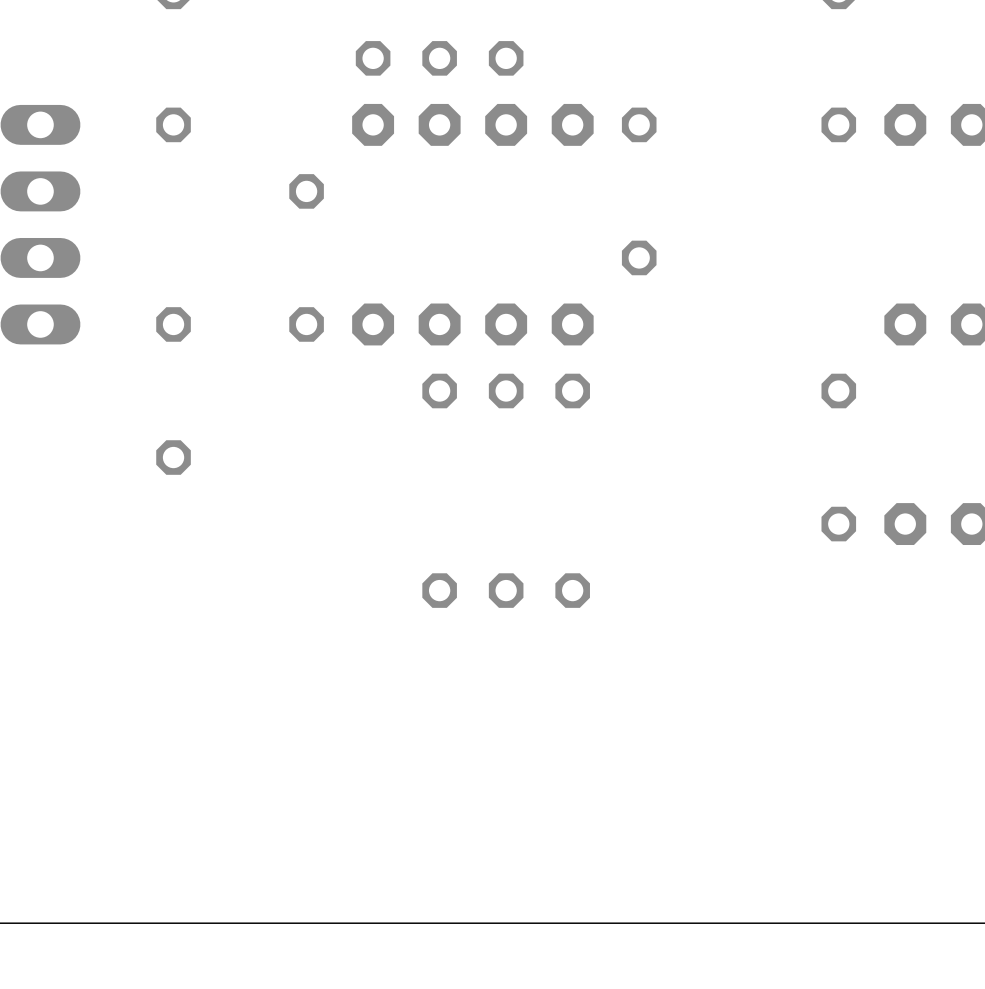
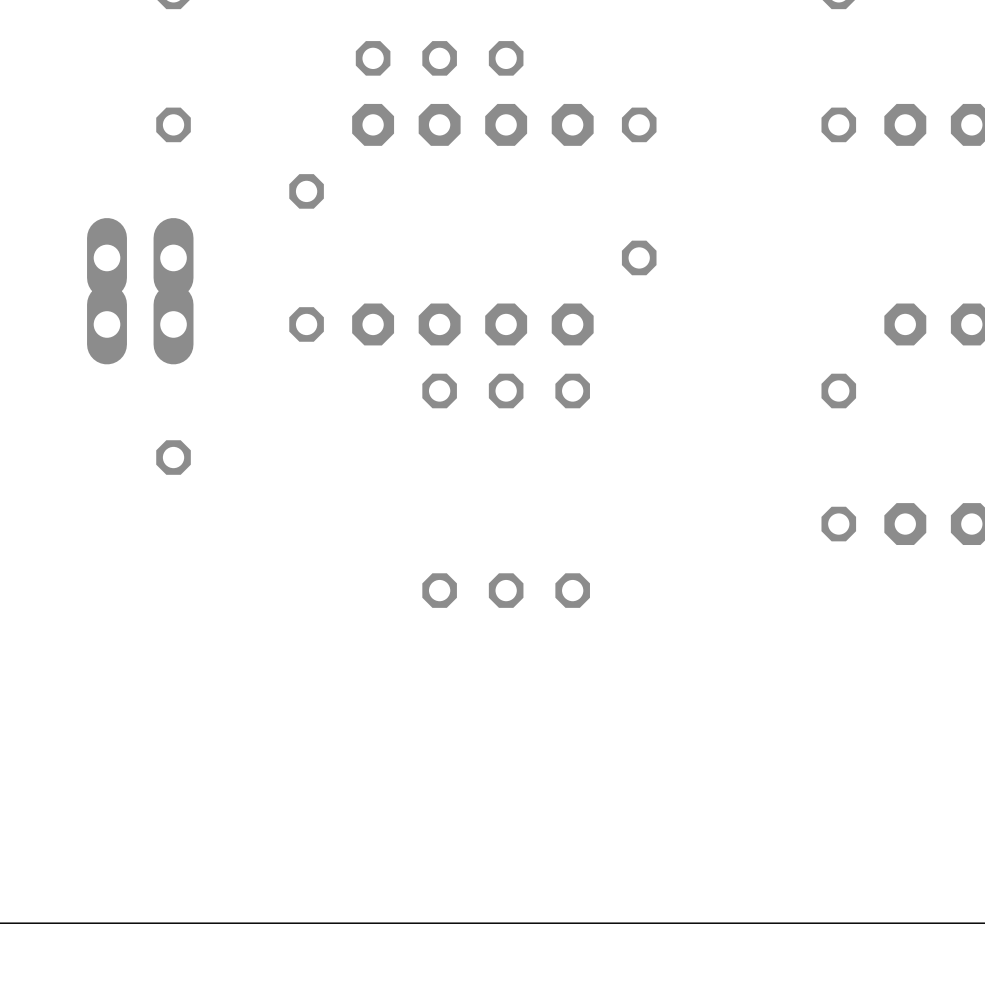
part: (40, 158) -> none
part: none -> (140, 257)
part: (40, 291) -> none
part: none -> (140, 324)

